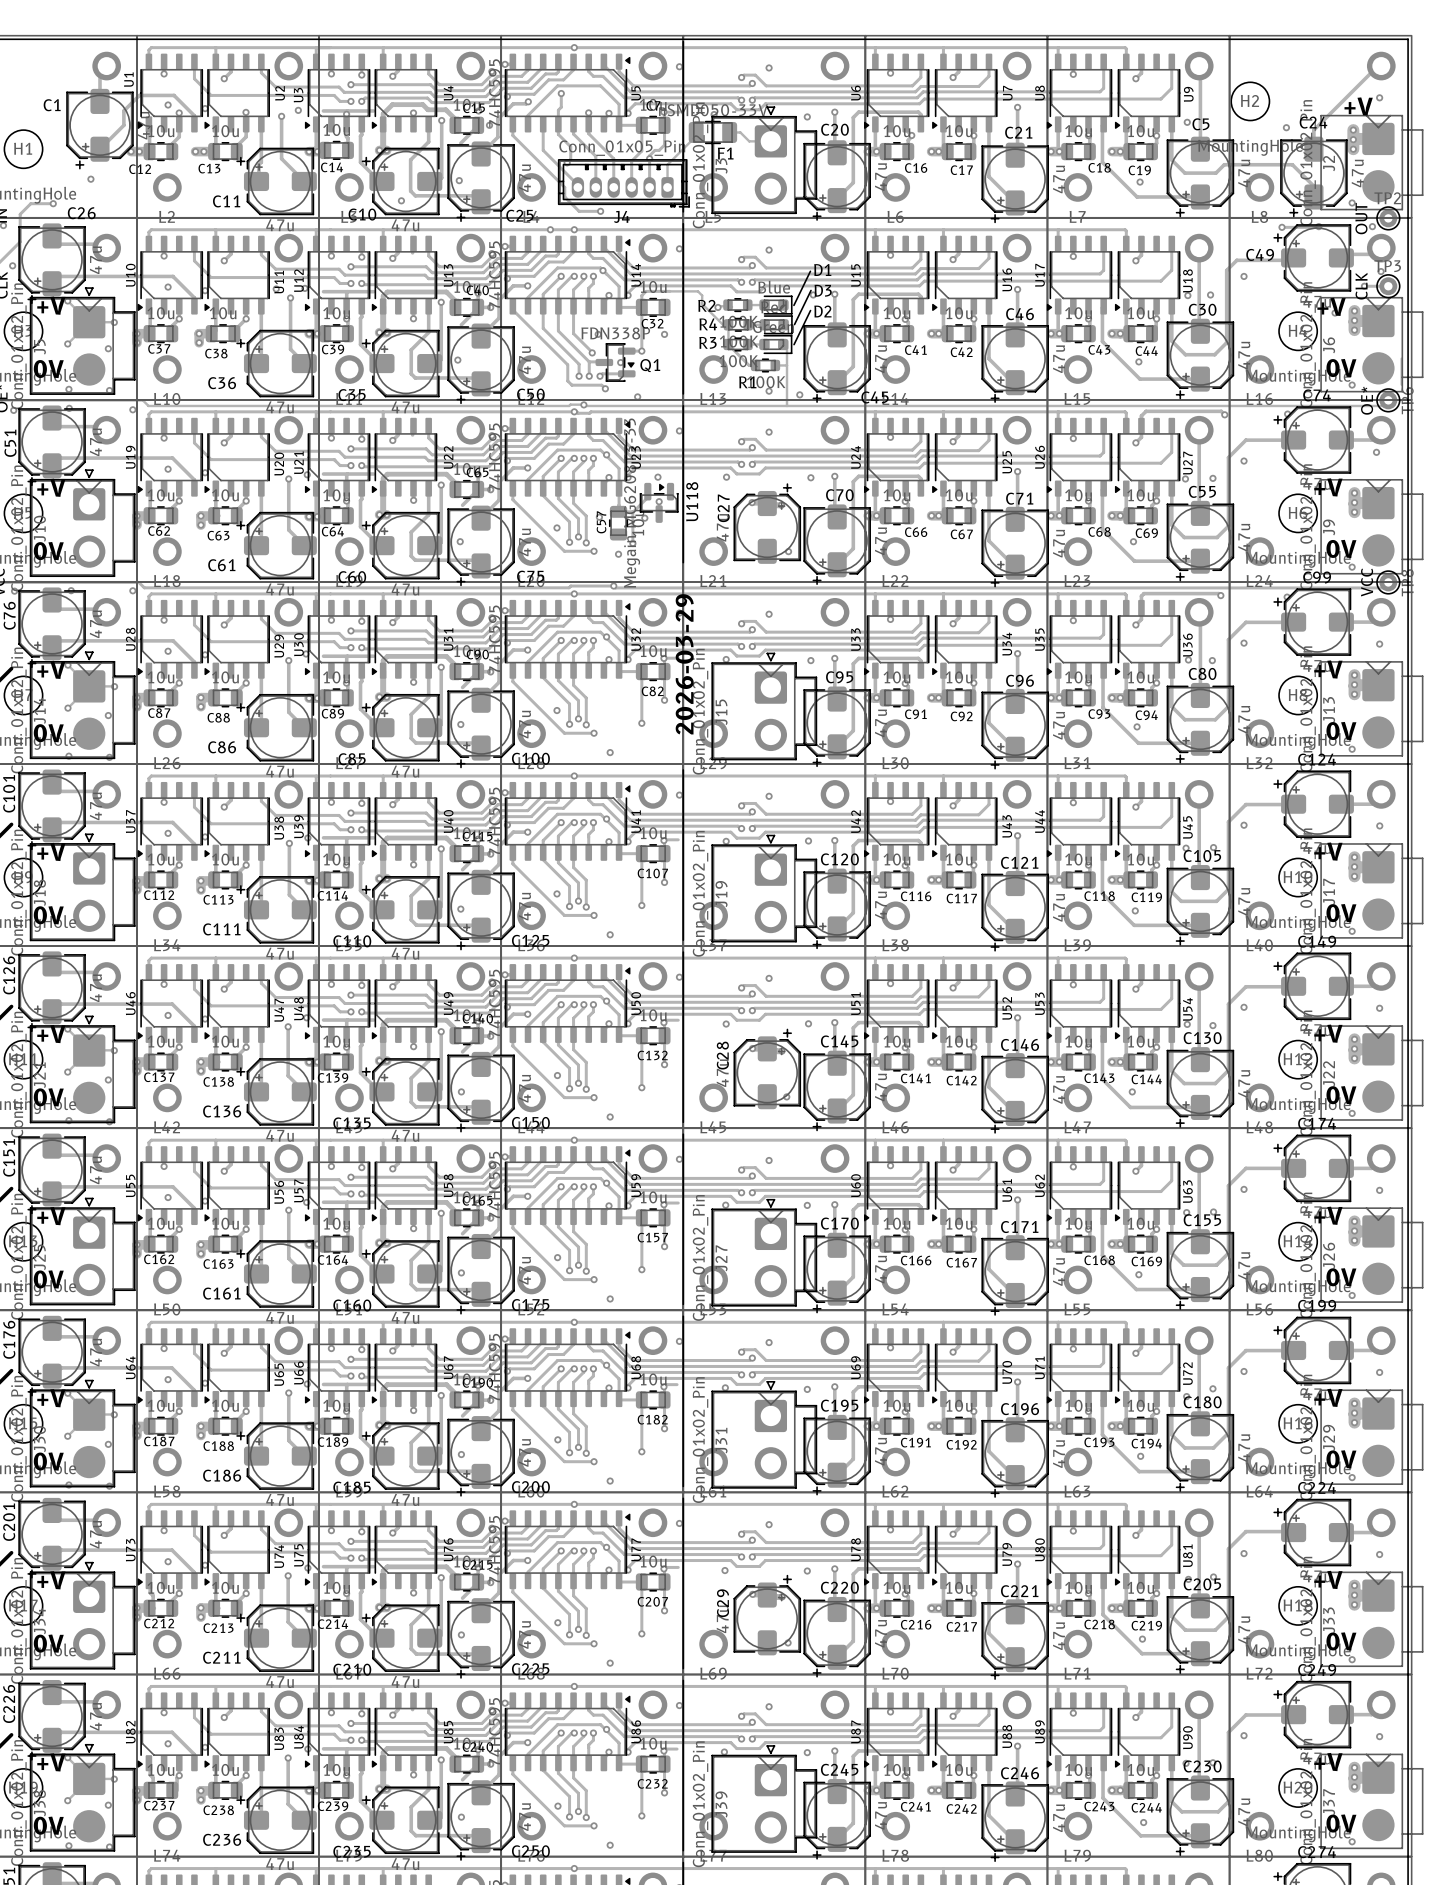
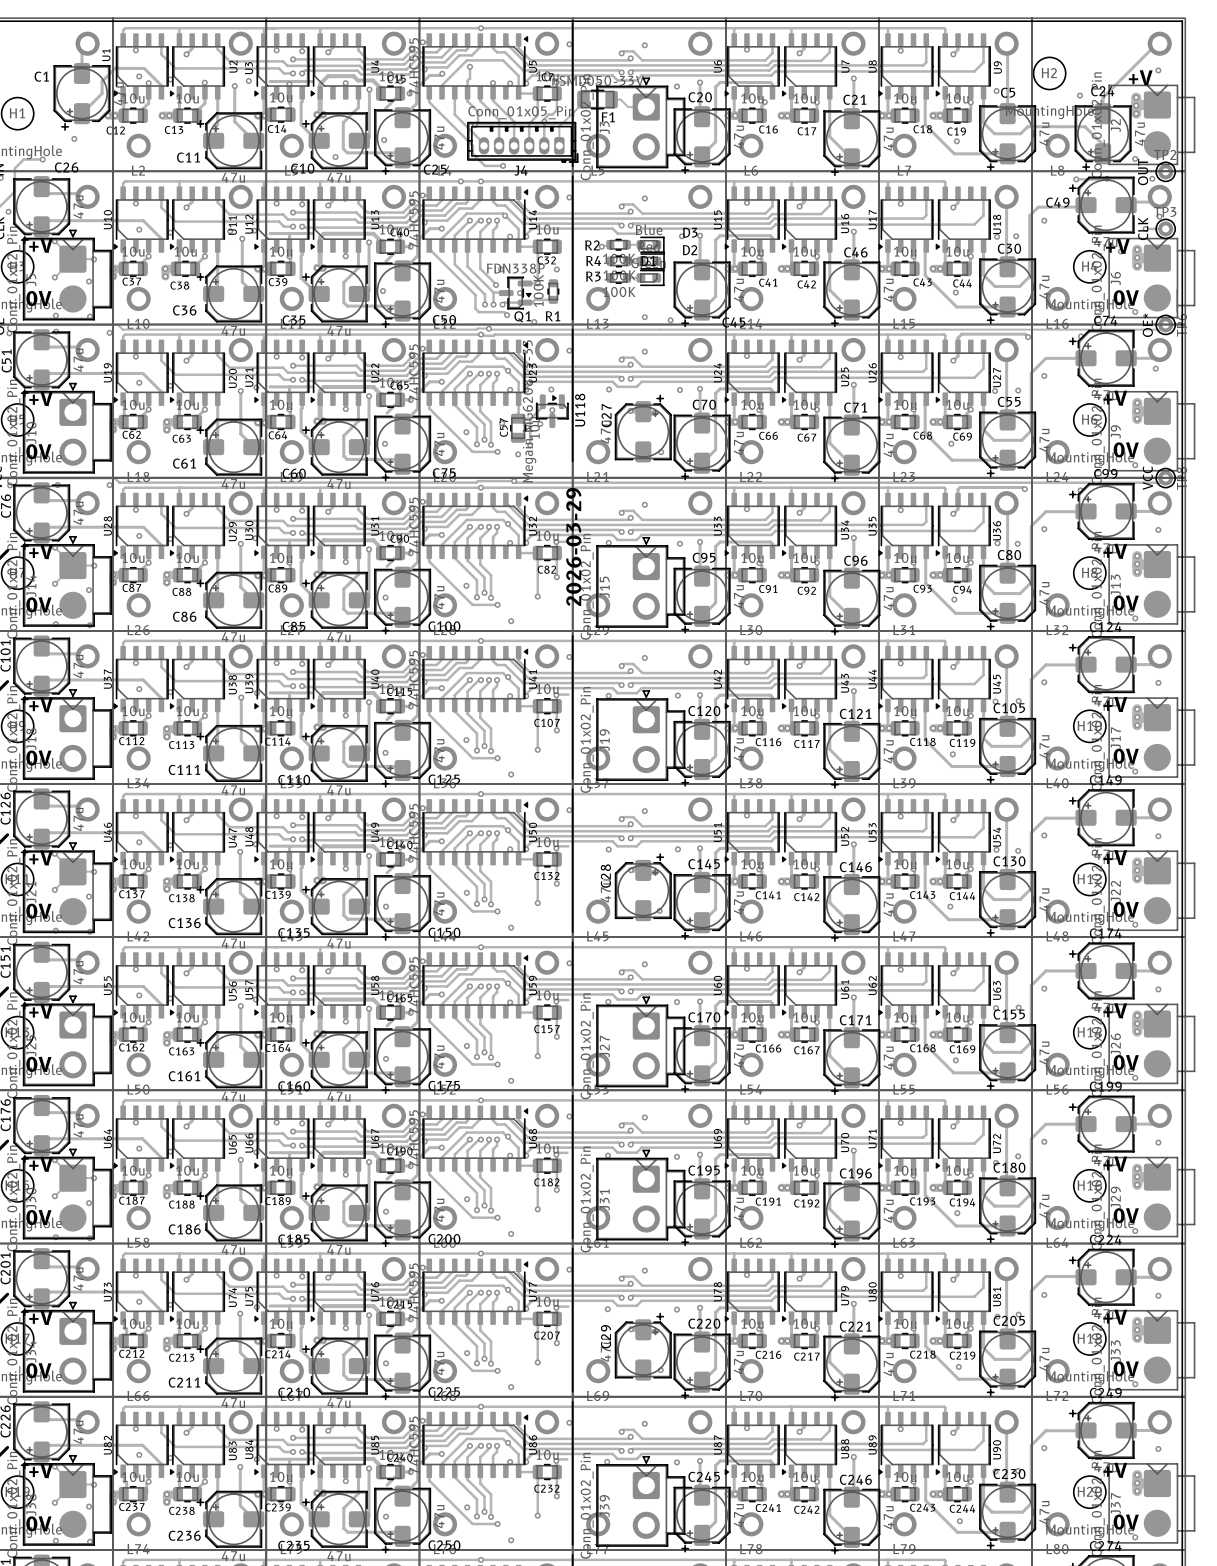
D1 name position: D1 (822, 270) -> D1 (648, 261)
line: (810, 271) (793, 305) -> none
line: (811, 290) (794, 324) -> none
track: (641, 307) (641, 295) (646, 291) (697, 291) (702, 295) (702, 303) (723, 324) (728, 324) (728, 344) -> none
line: (810, 310) (794, 344) -> none
track: (728, 344) (749, 365) (755, 363) -> none
track: (783, 344) (787, 348) (787, 405) -> none
Q1 name position: Q1 (650, 365) -> Q1 (522, 316)
R1 rotation: 0° (765, 365) -> 90° clockwise (553, 291)
R1 position: (765, 365) -> (553, 291)
track: (775, 365) (787, 365) -> none
track: none -> (553, 299) (535, 299) (532, 302) (525, 302)

